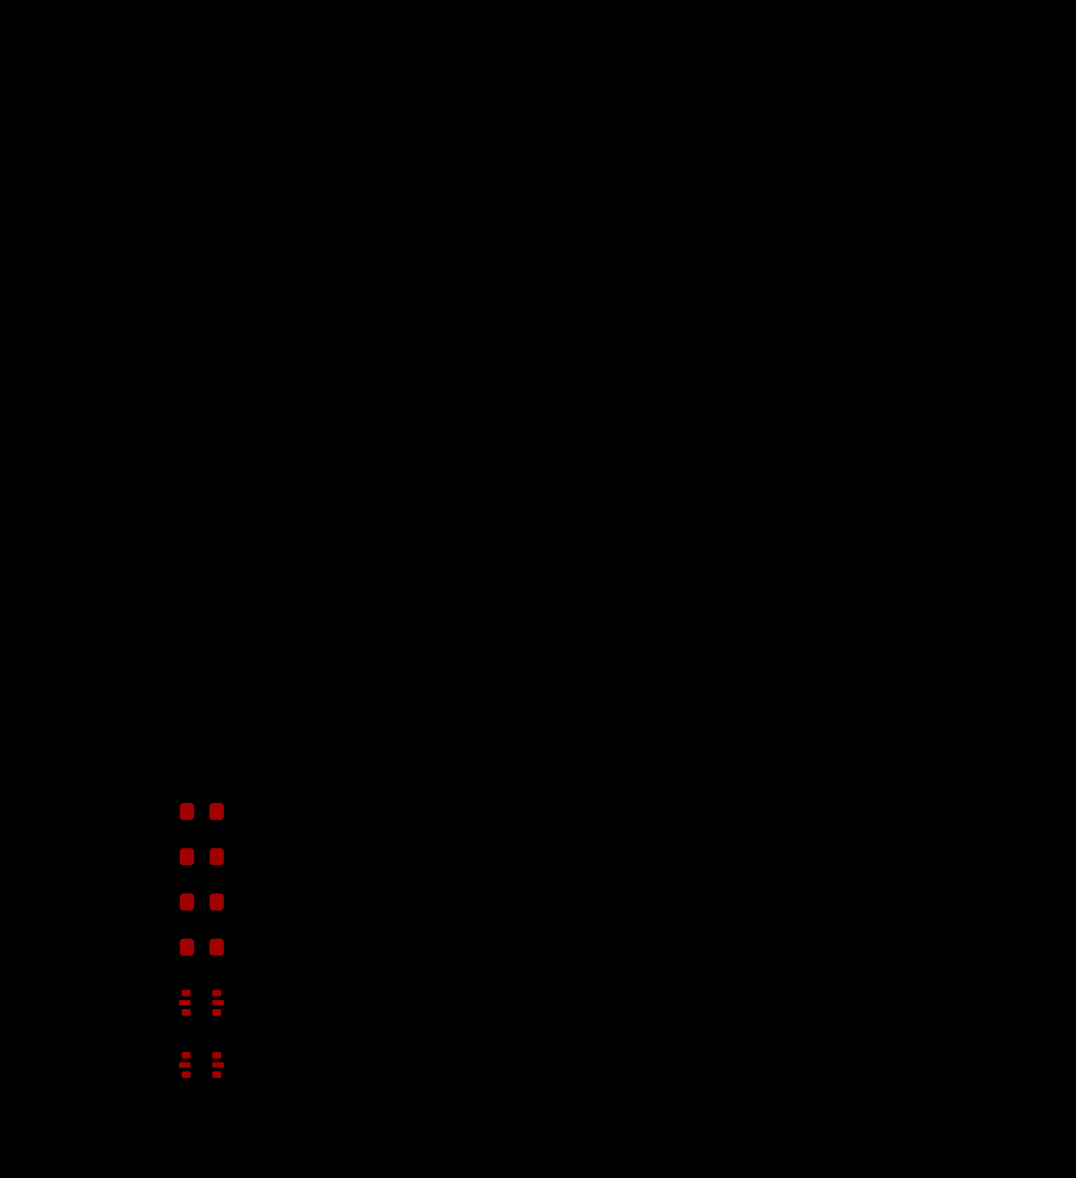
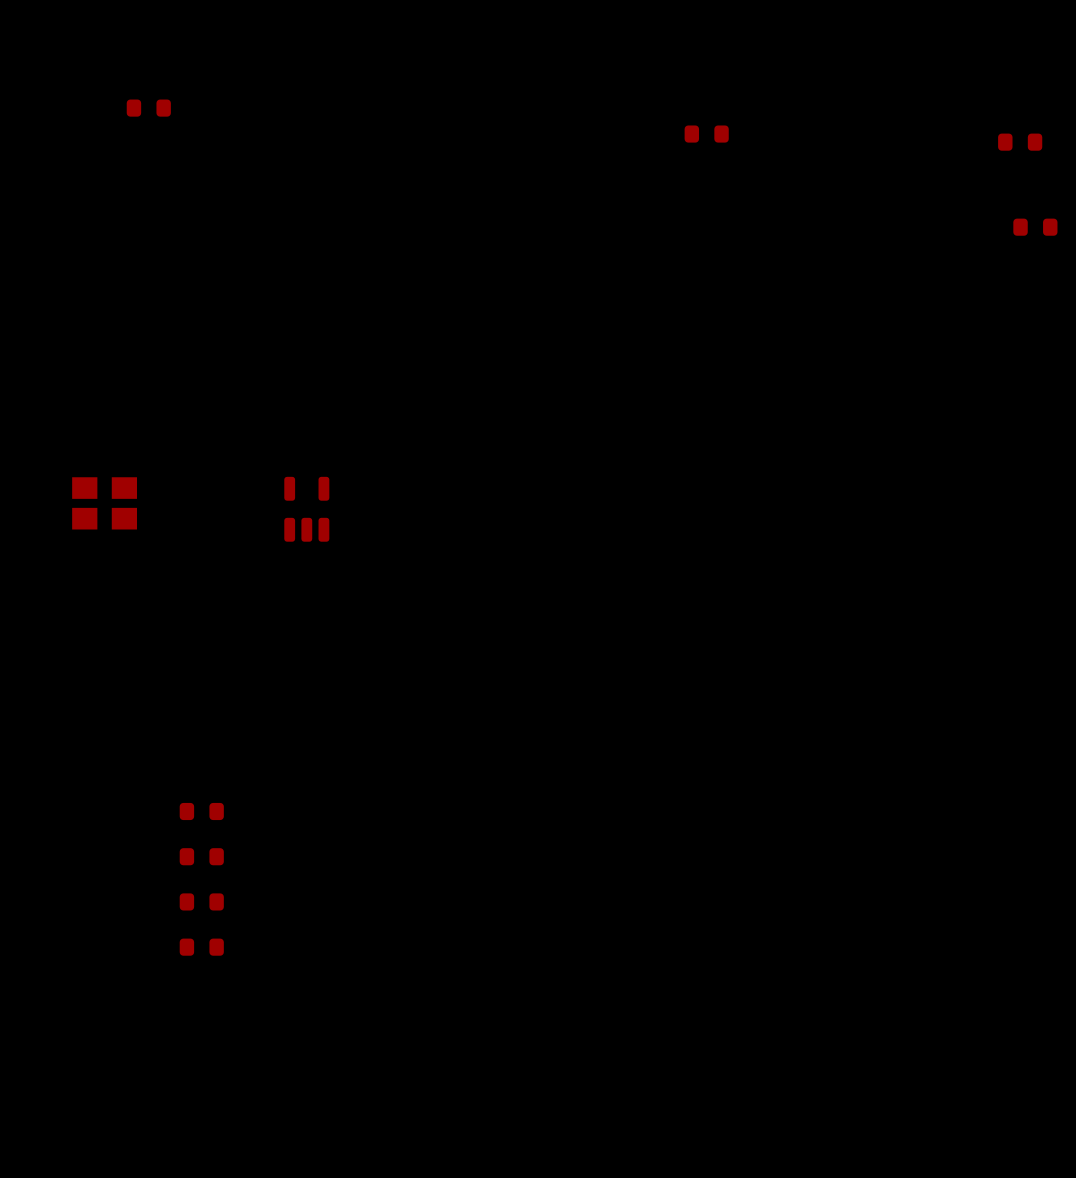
part: none -> (148, 108)
part: none -> (706, 134)
part: none -> (1020, 142)
part: none -> (1035, 227)
part: none -> (104, 503)
part: none -> (306, 509)
part: (201, 1002) -> none
part: (201, 1064) -> none

